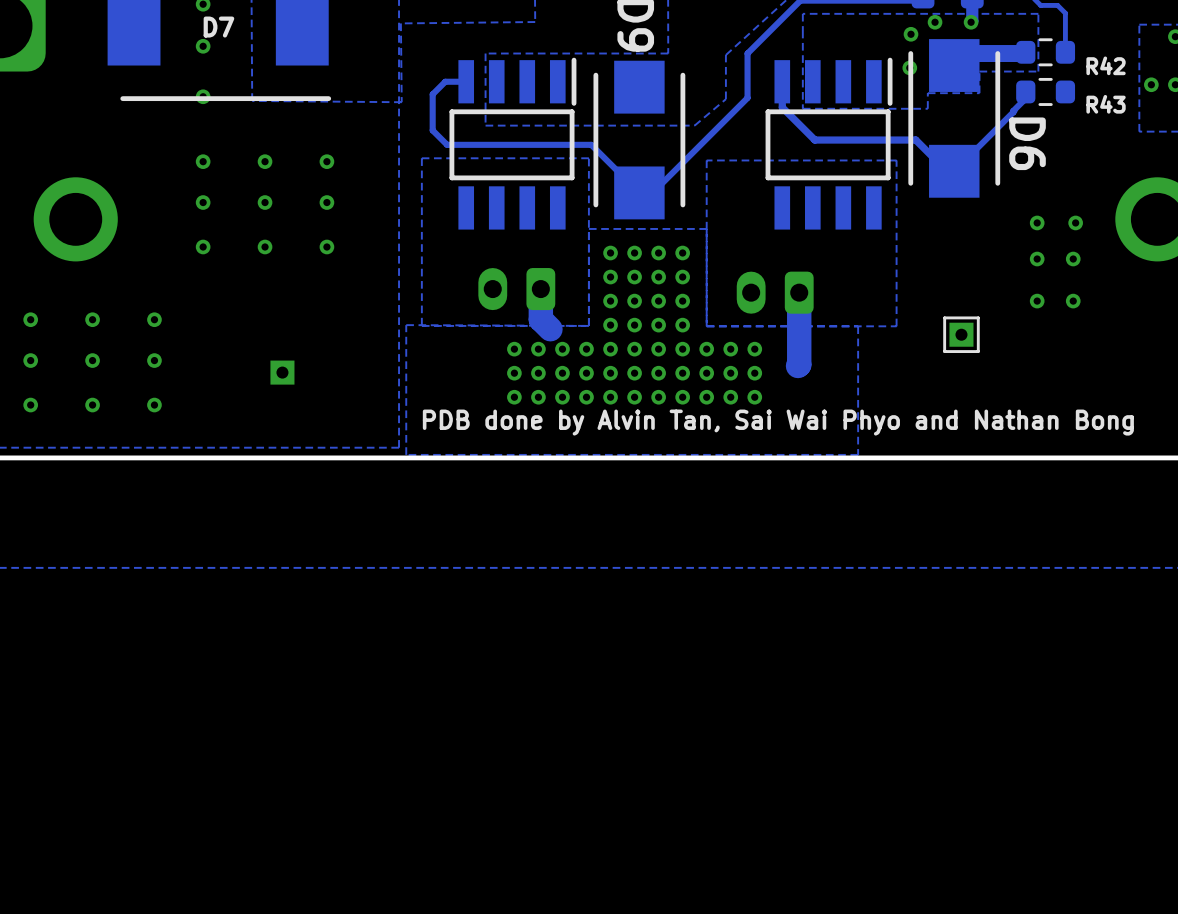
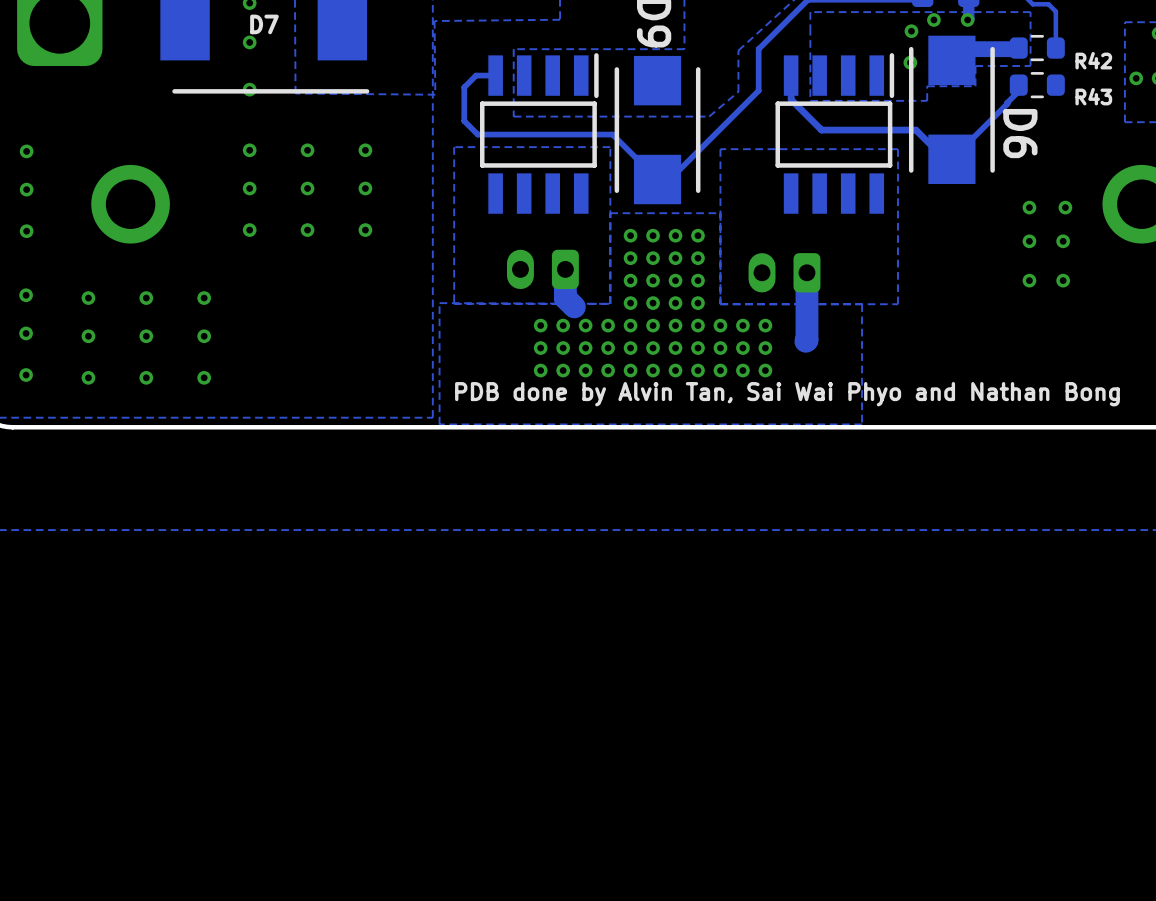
part: (961, 334) -> none
part: (282, 372) -> none

